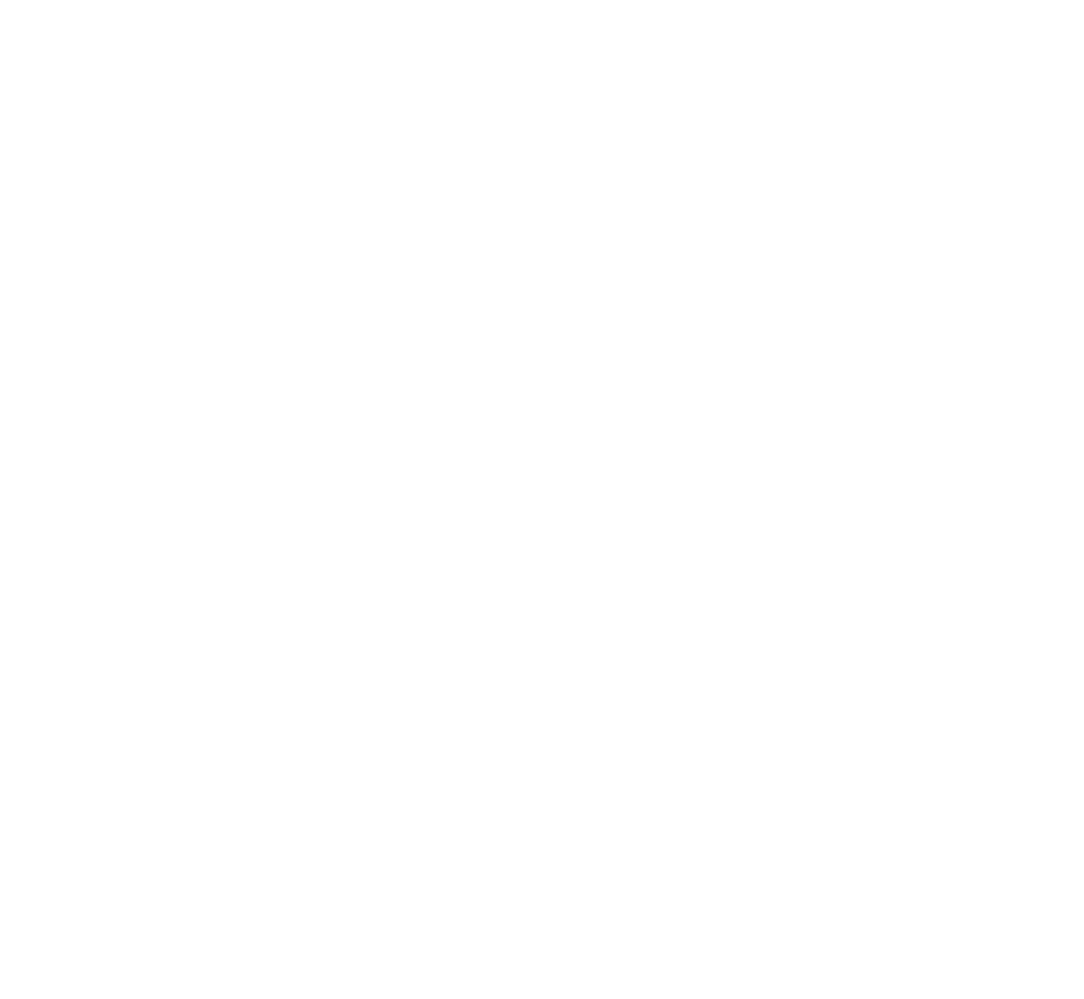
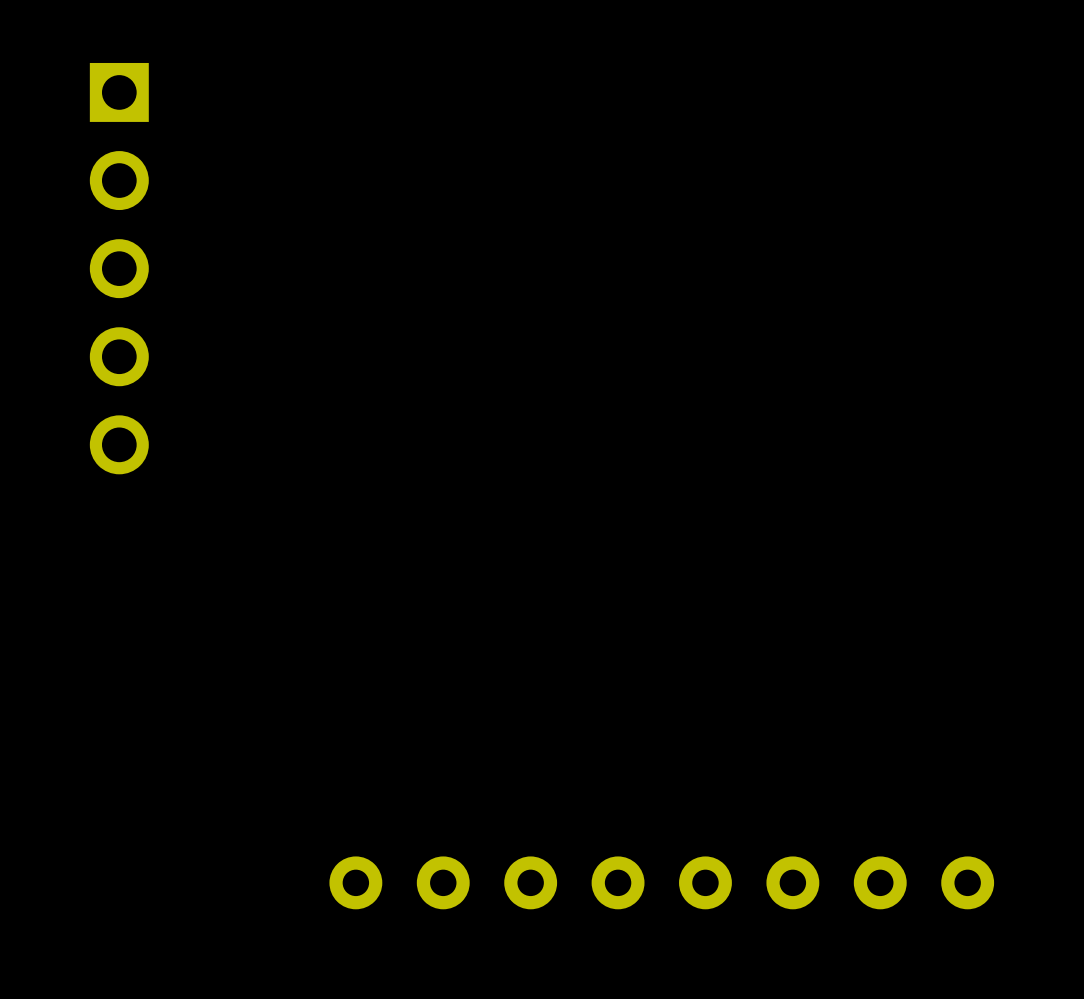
part: none -> (119, 268)
part: none -> (661, 882)

